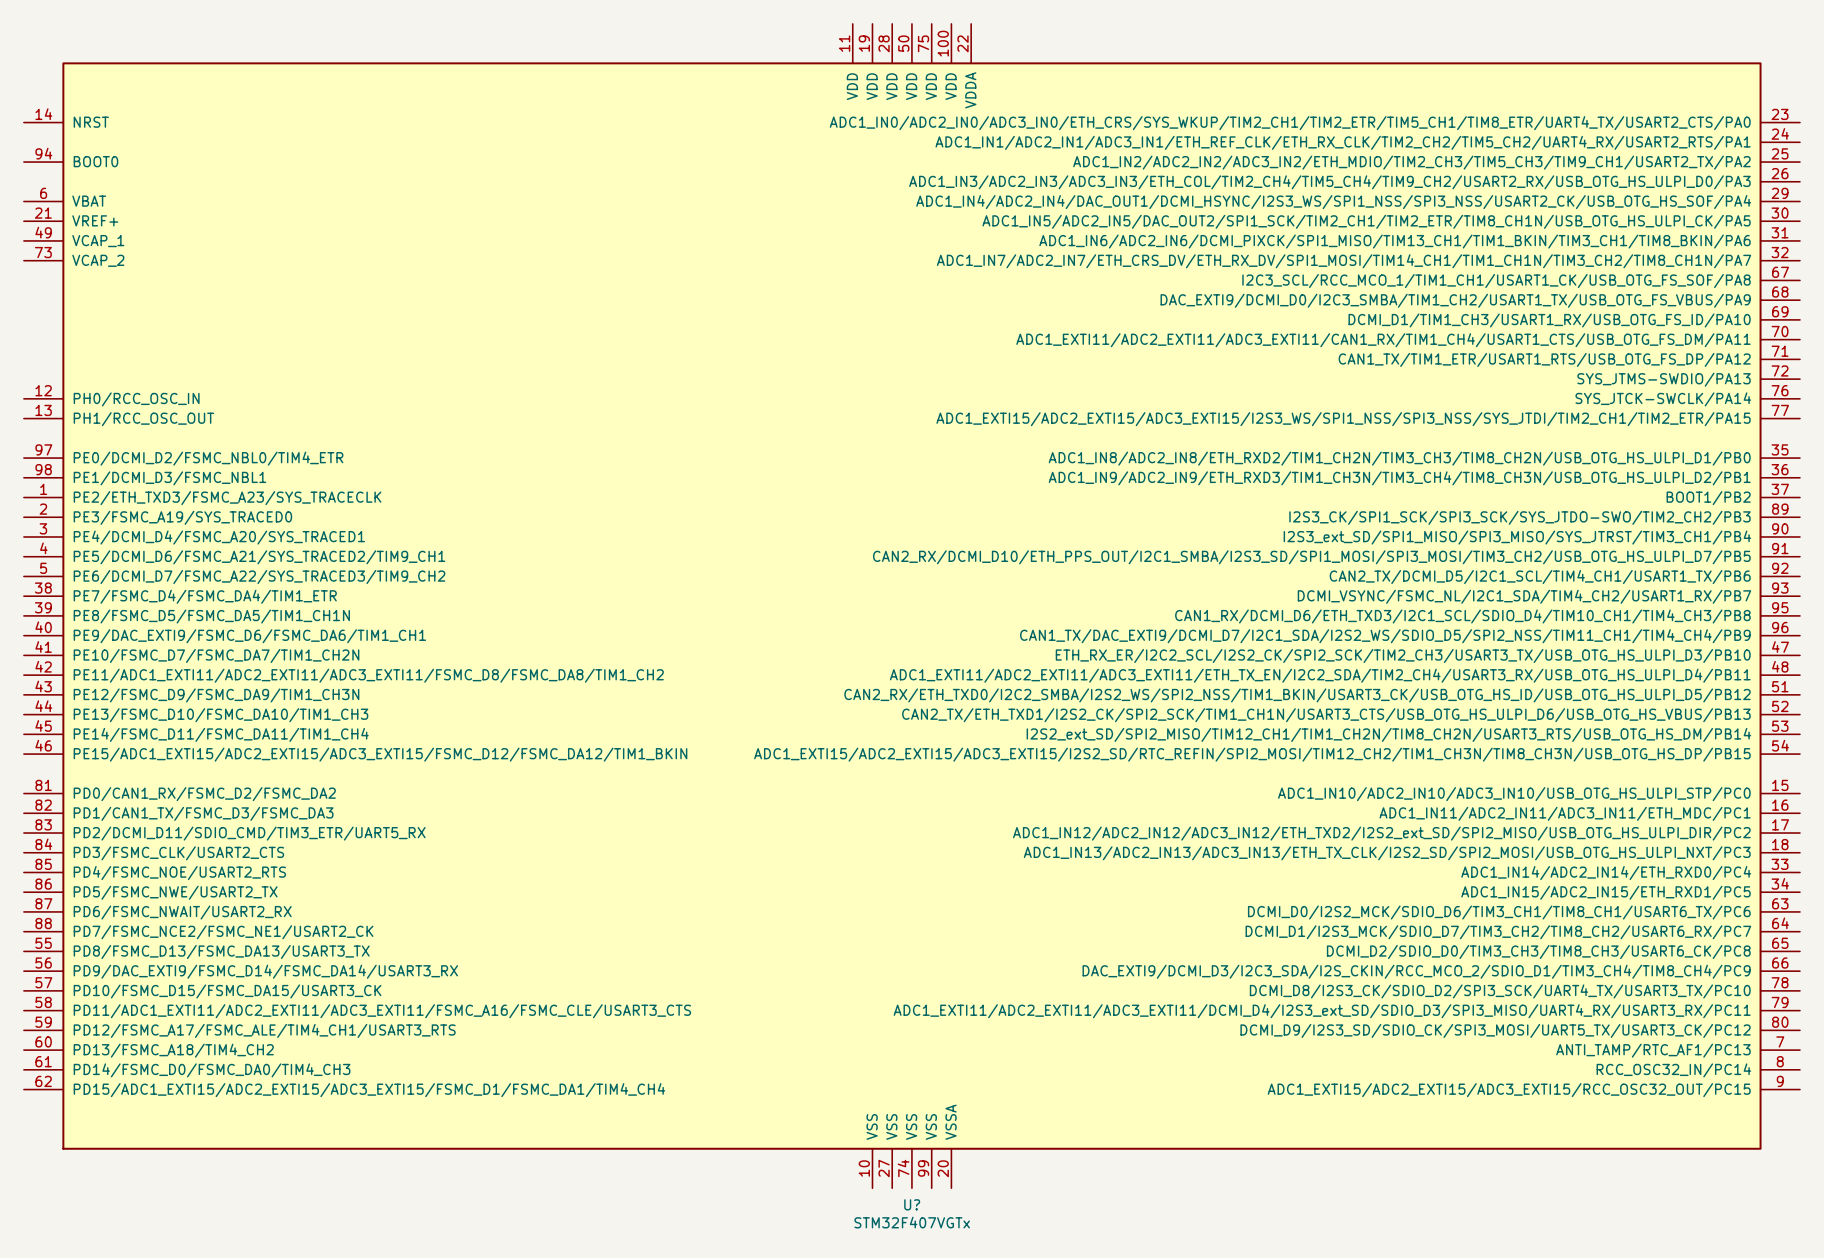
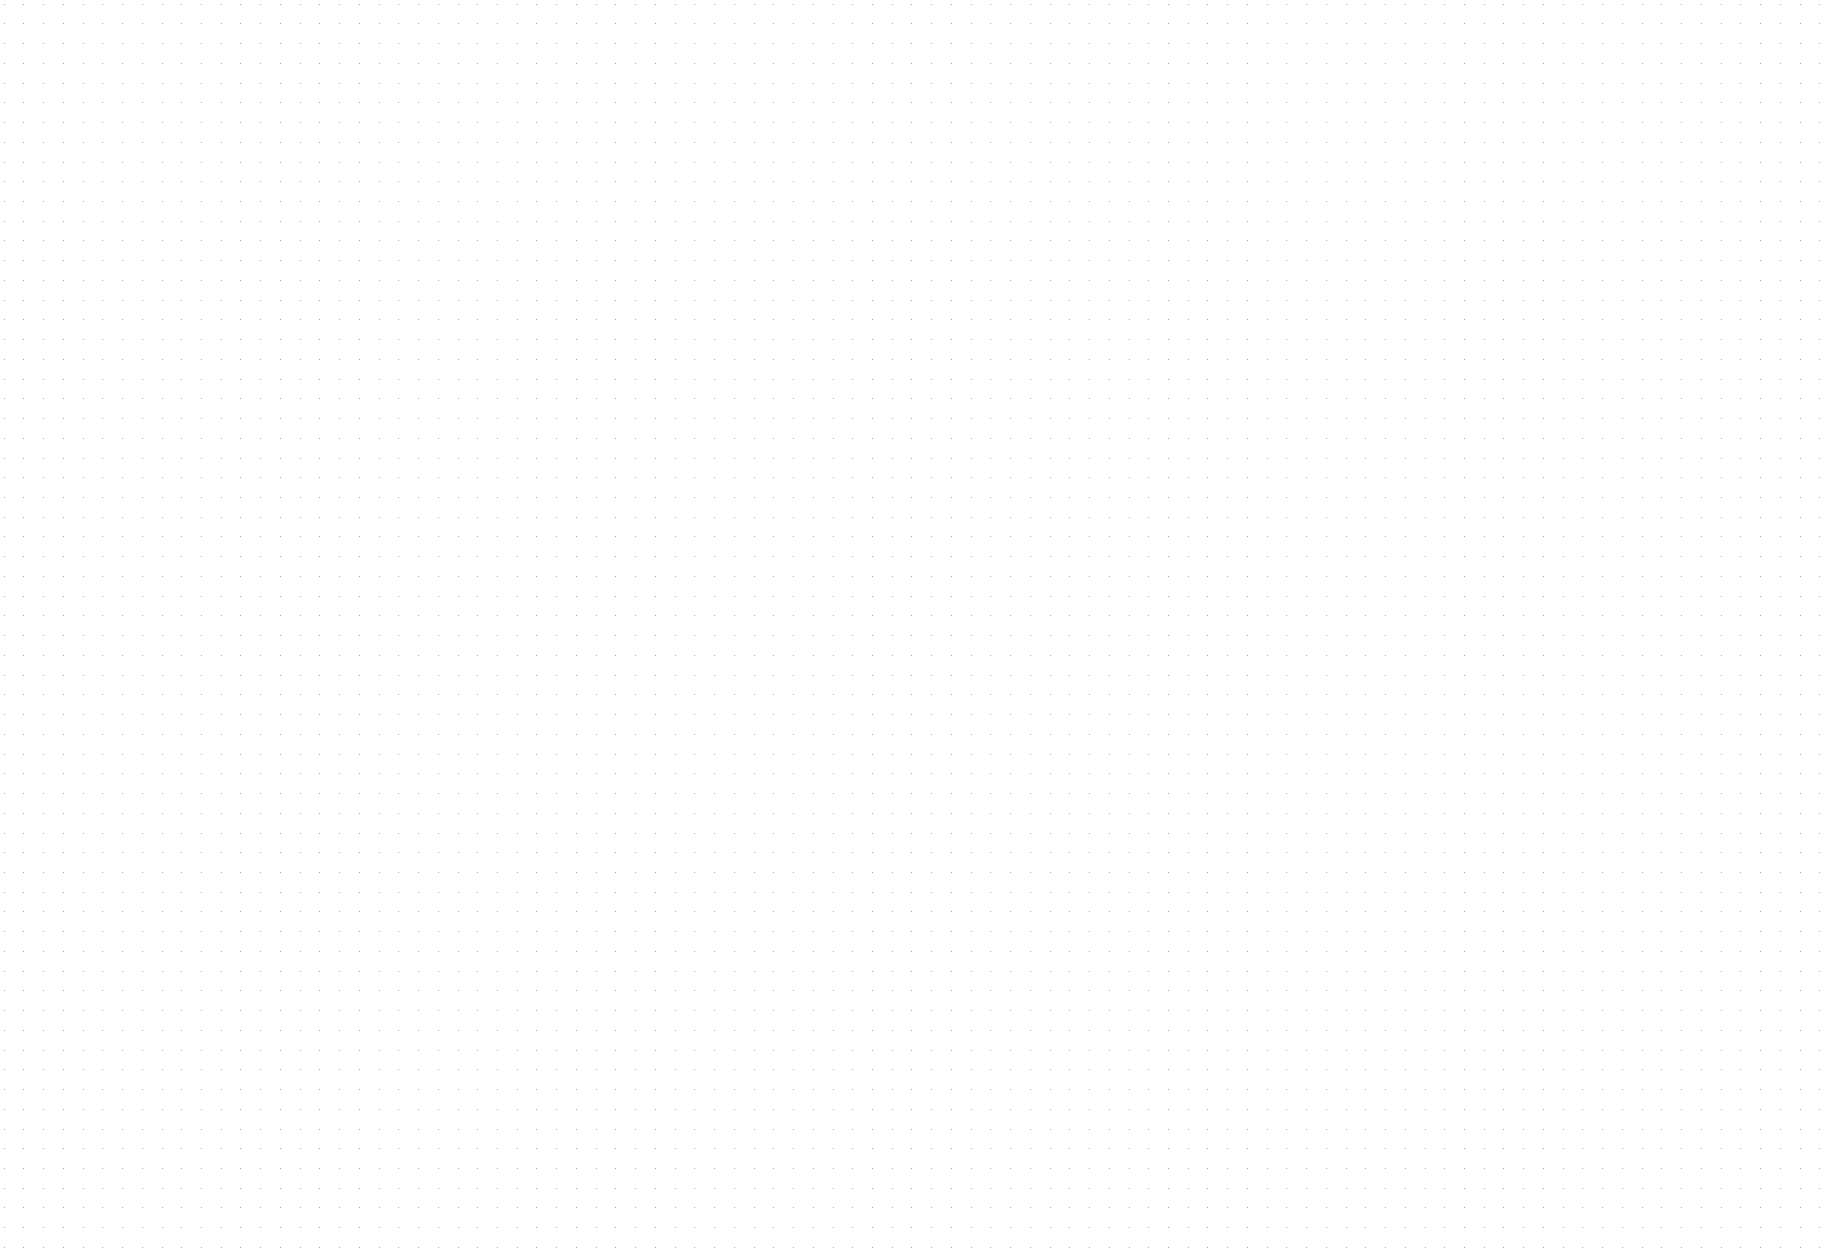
U?: STM32F407VGTx (911, 606) -> none

